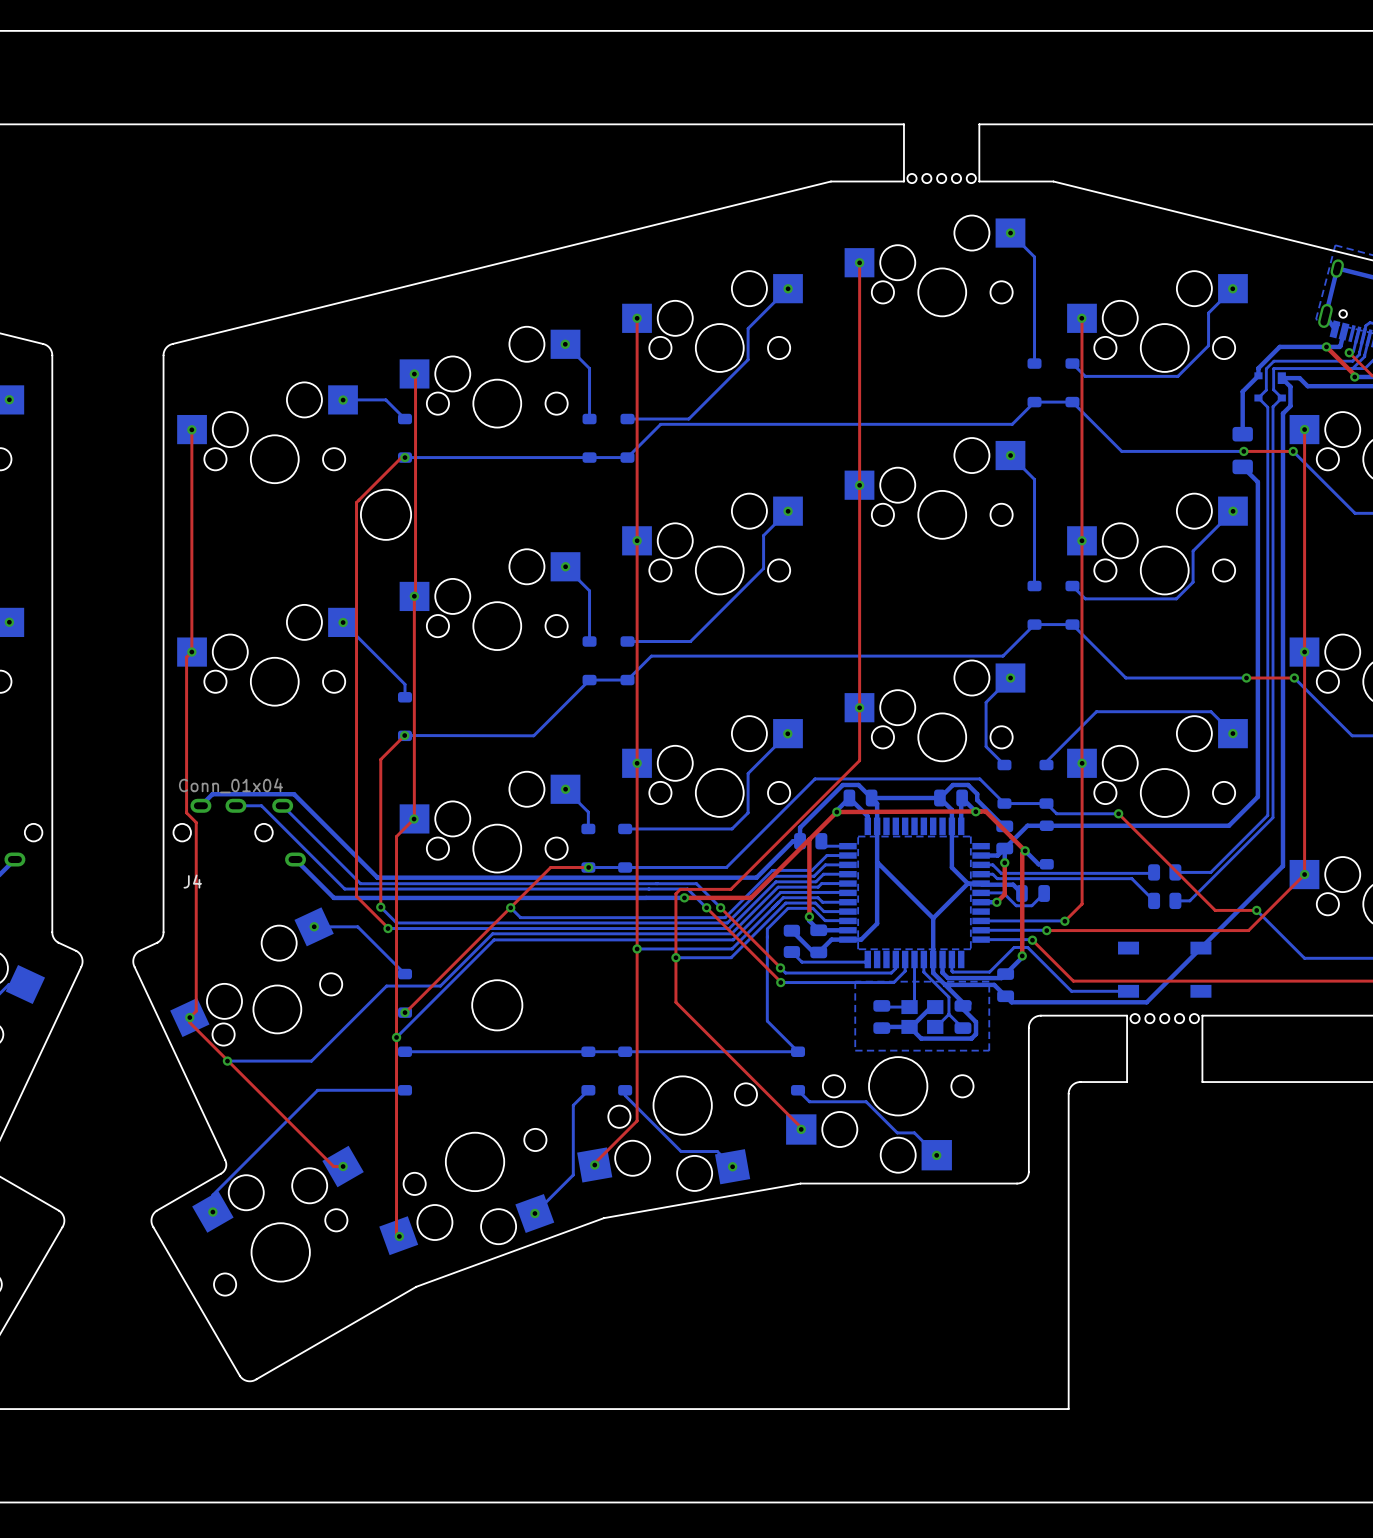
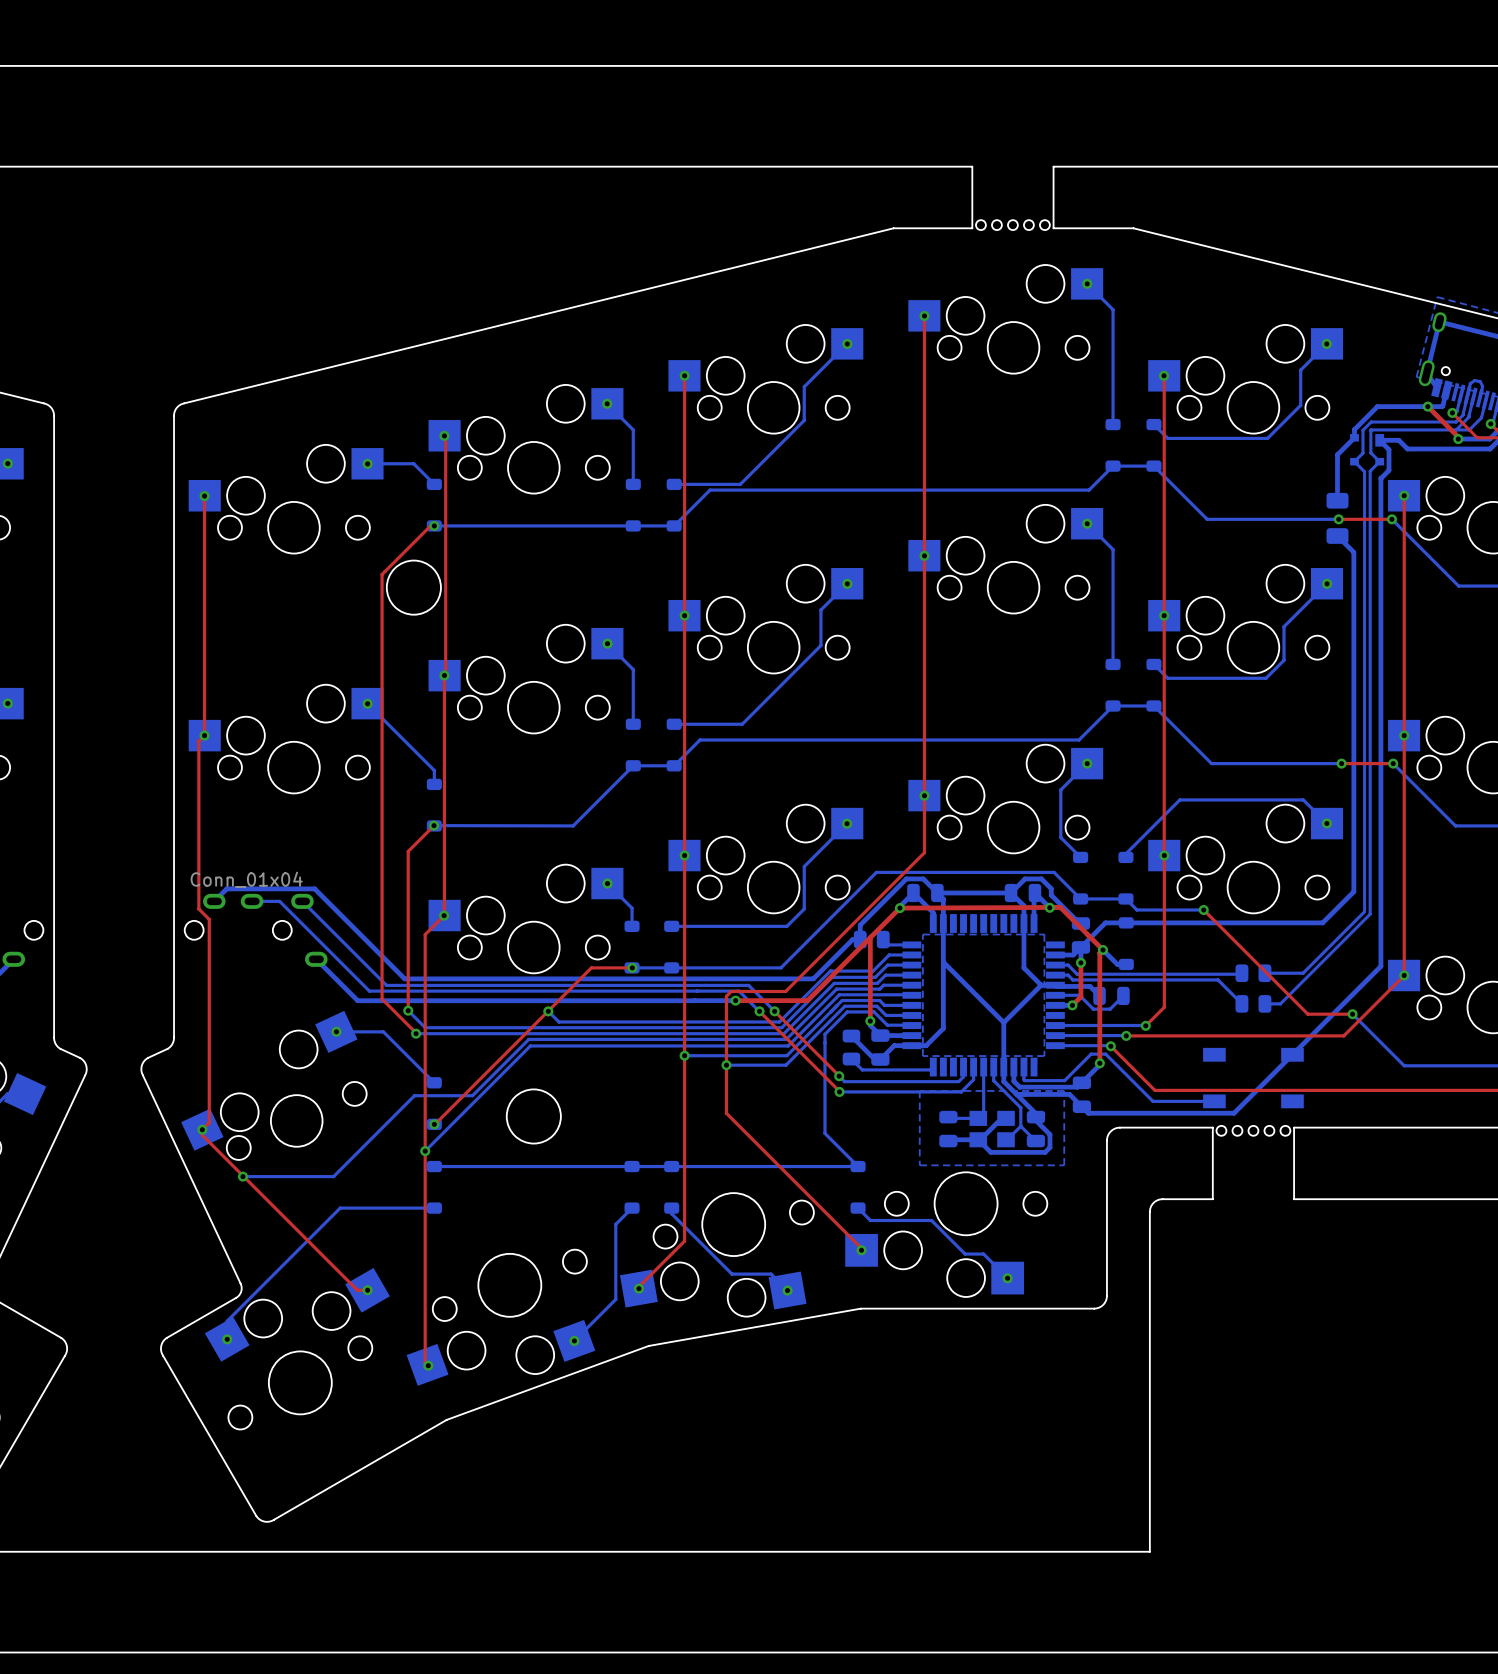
J4 name: J4 (192, 881) -> none

